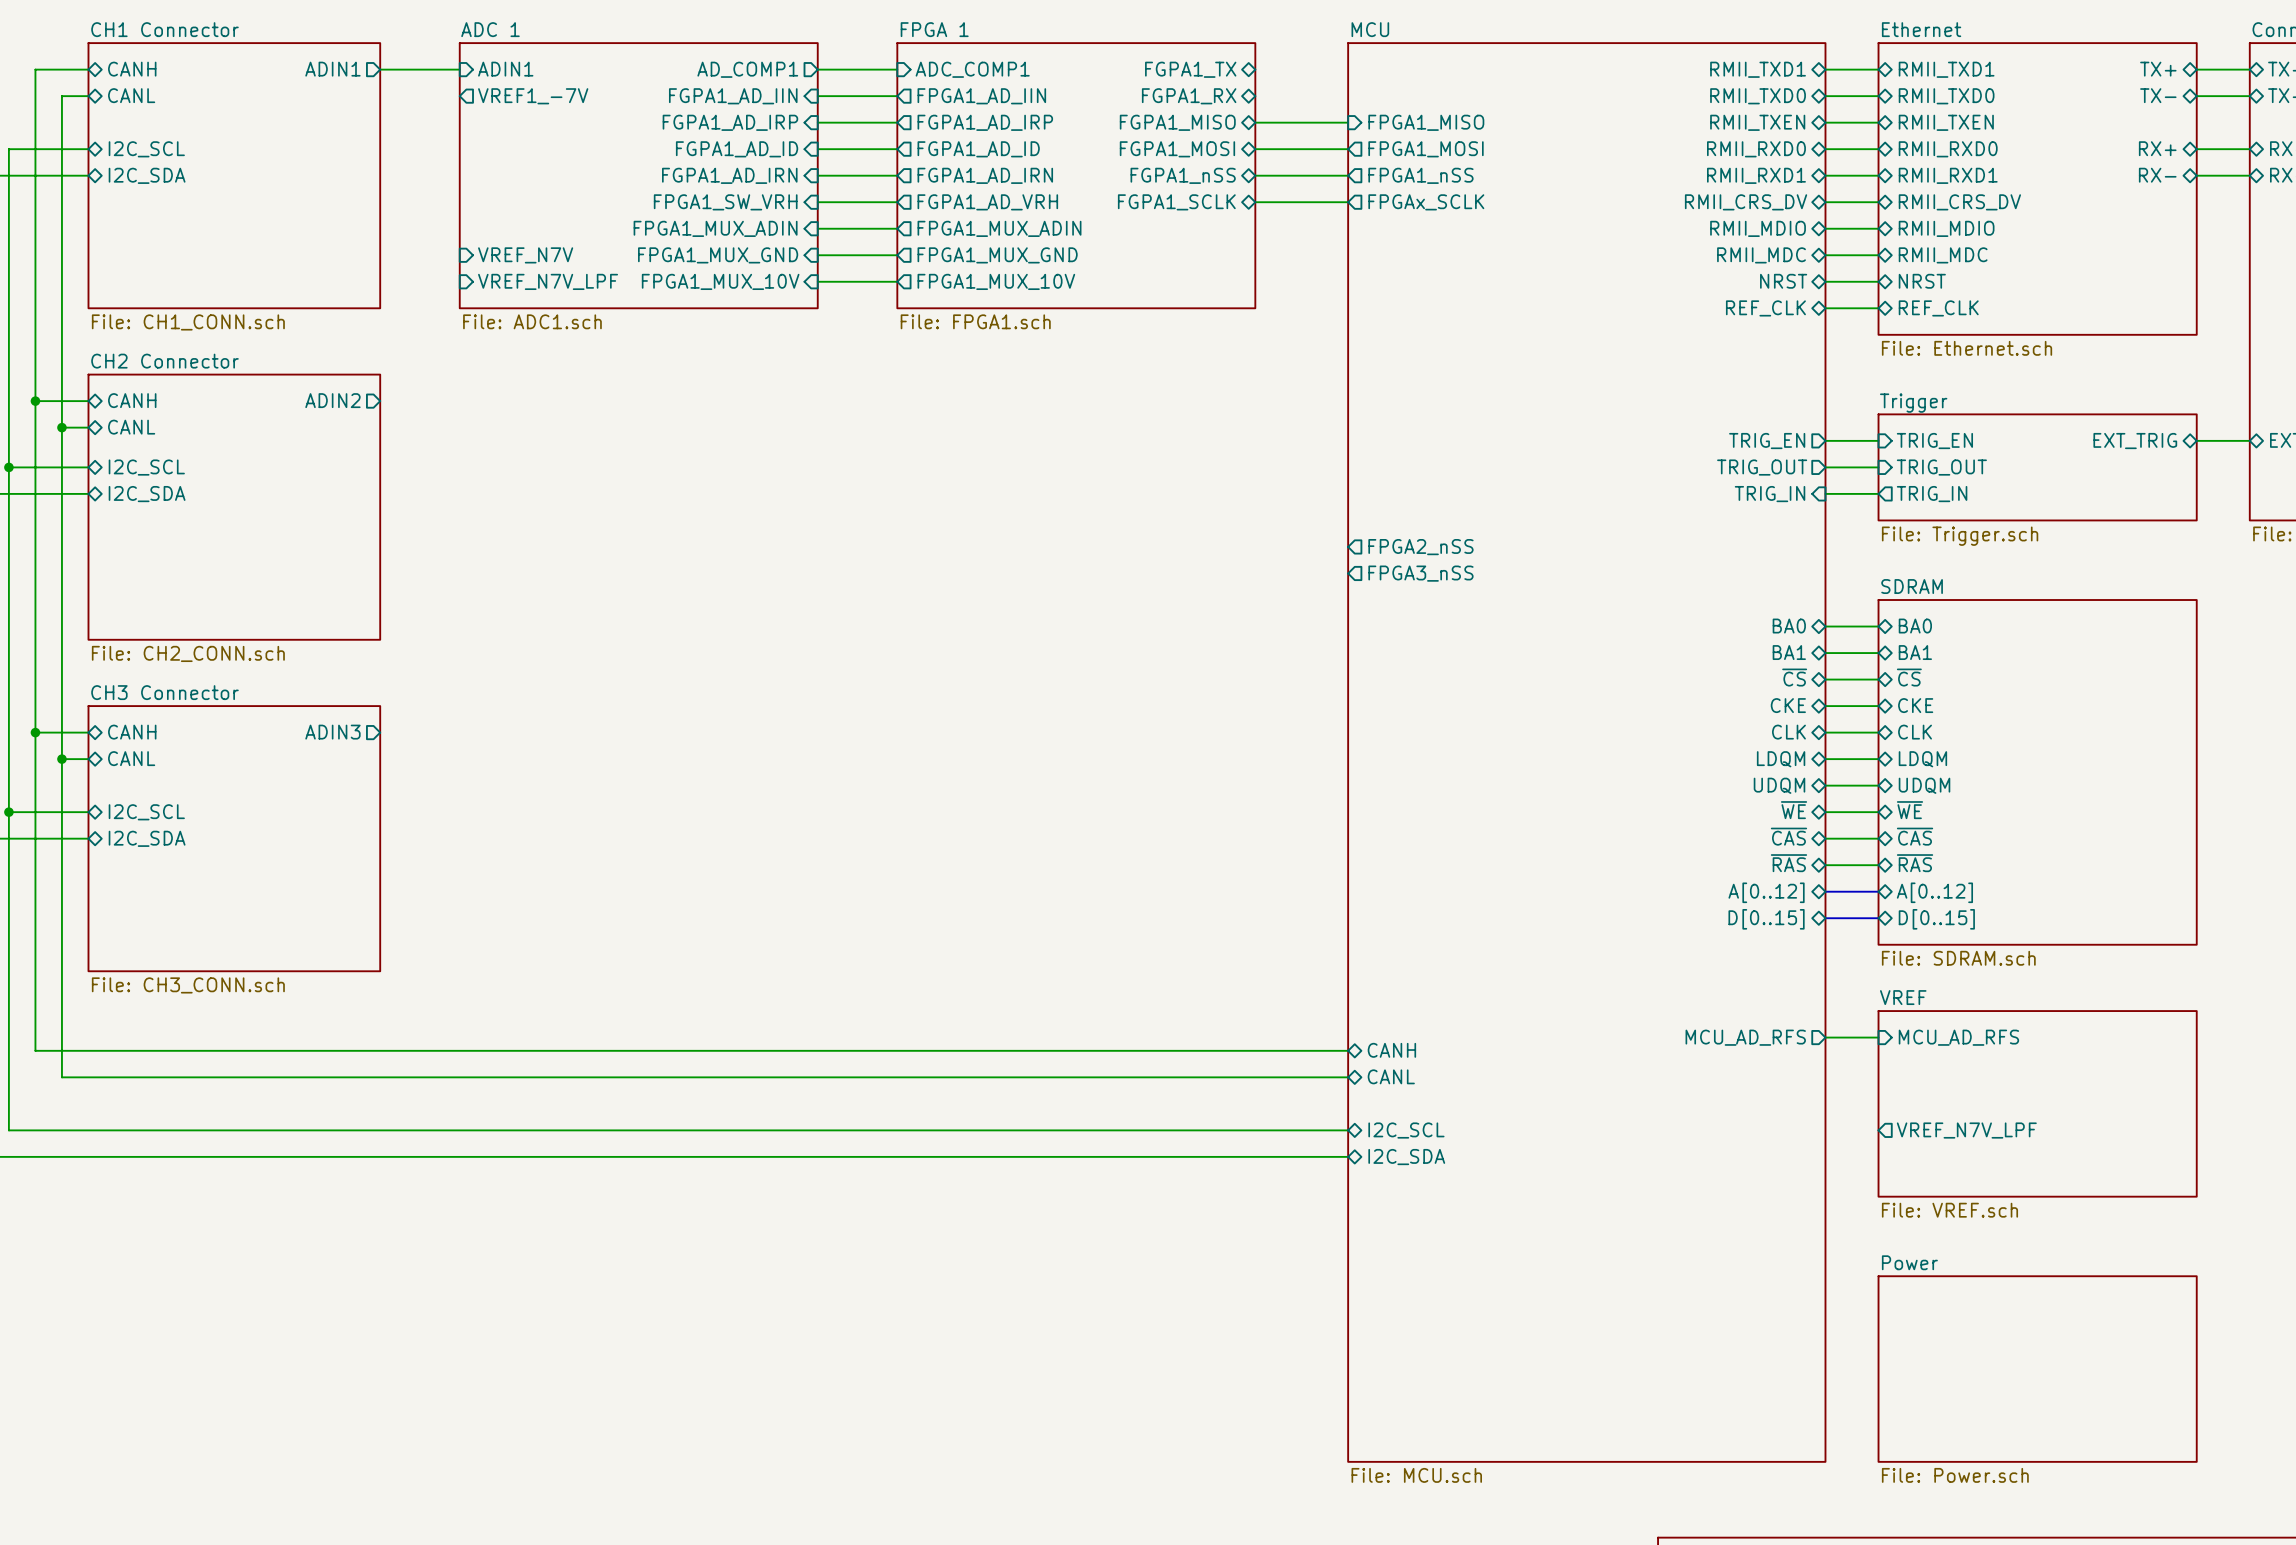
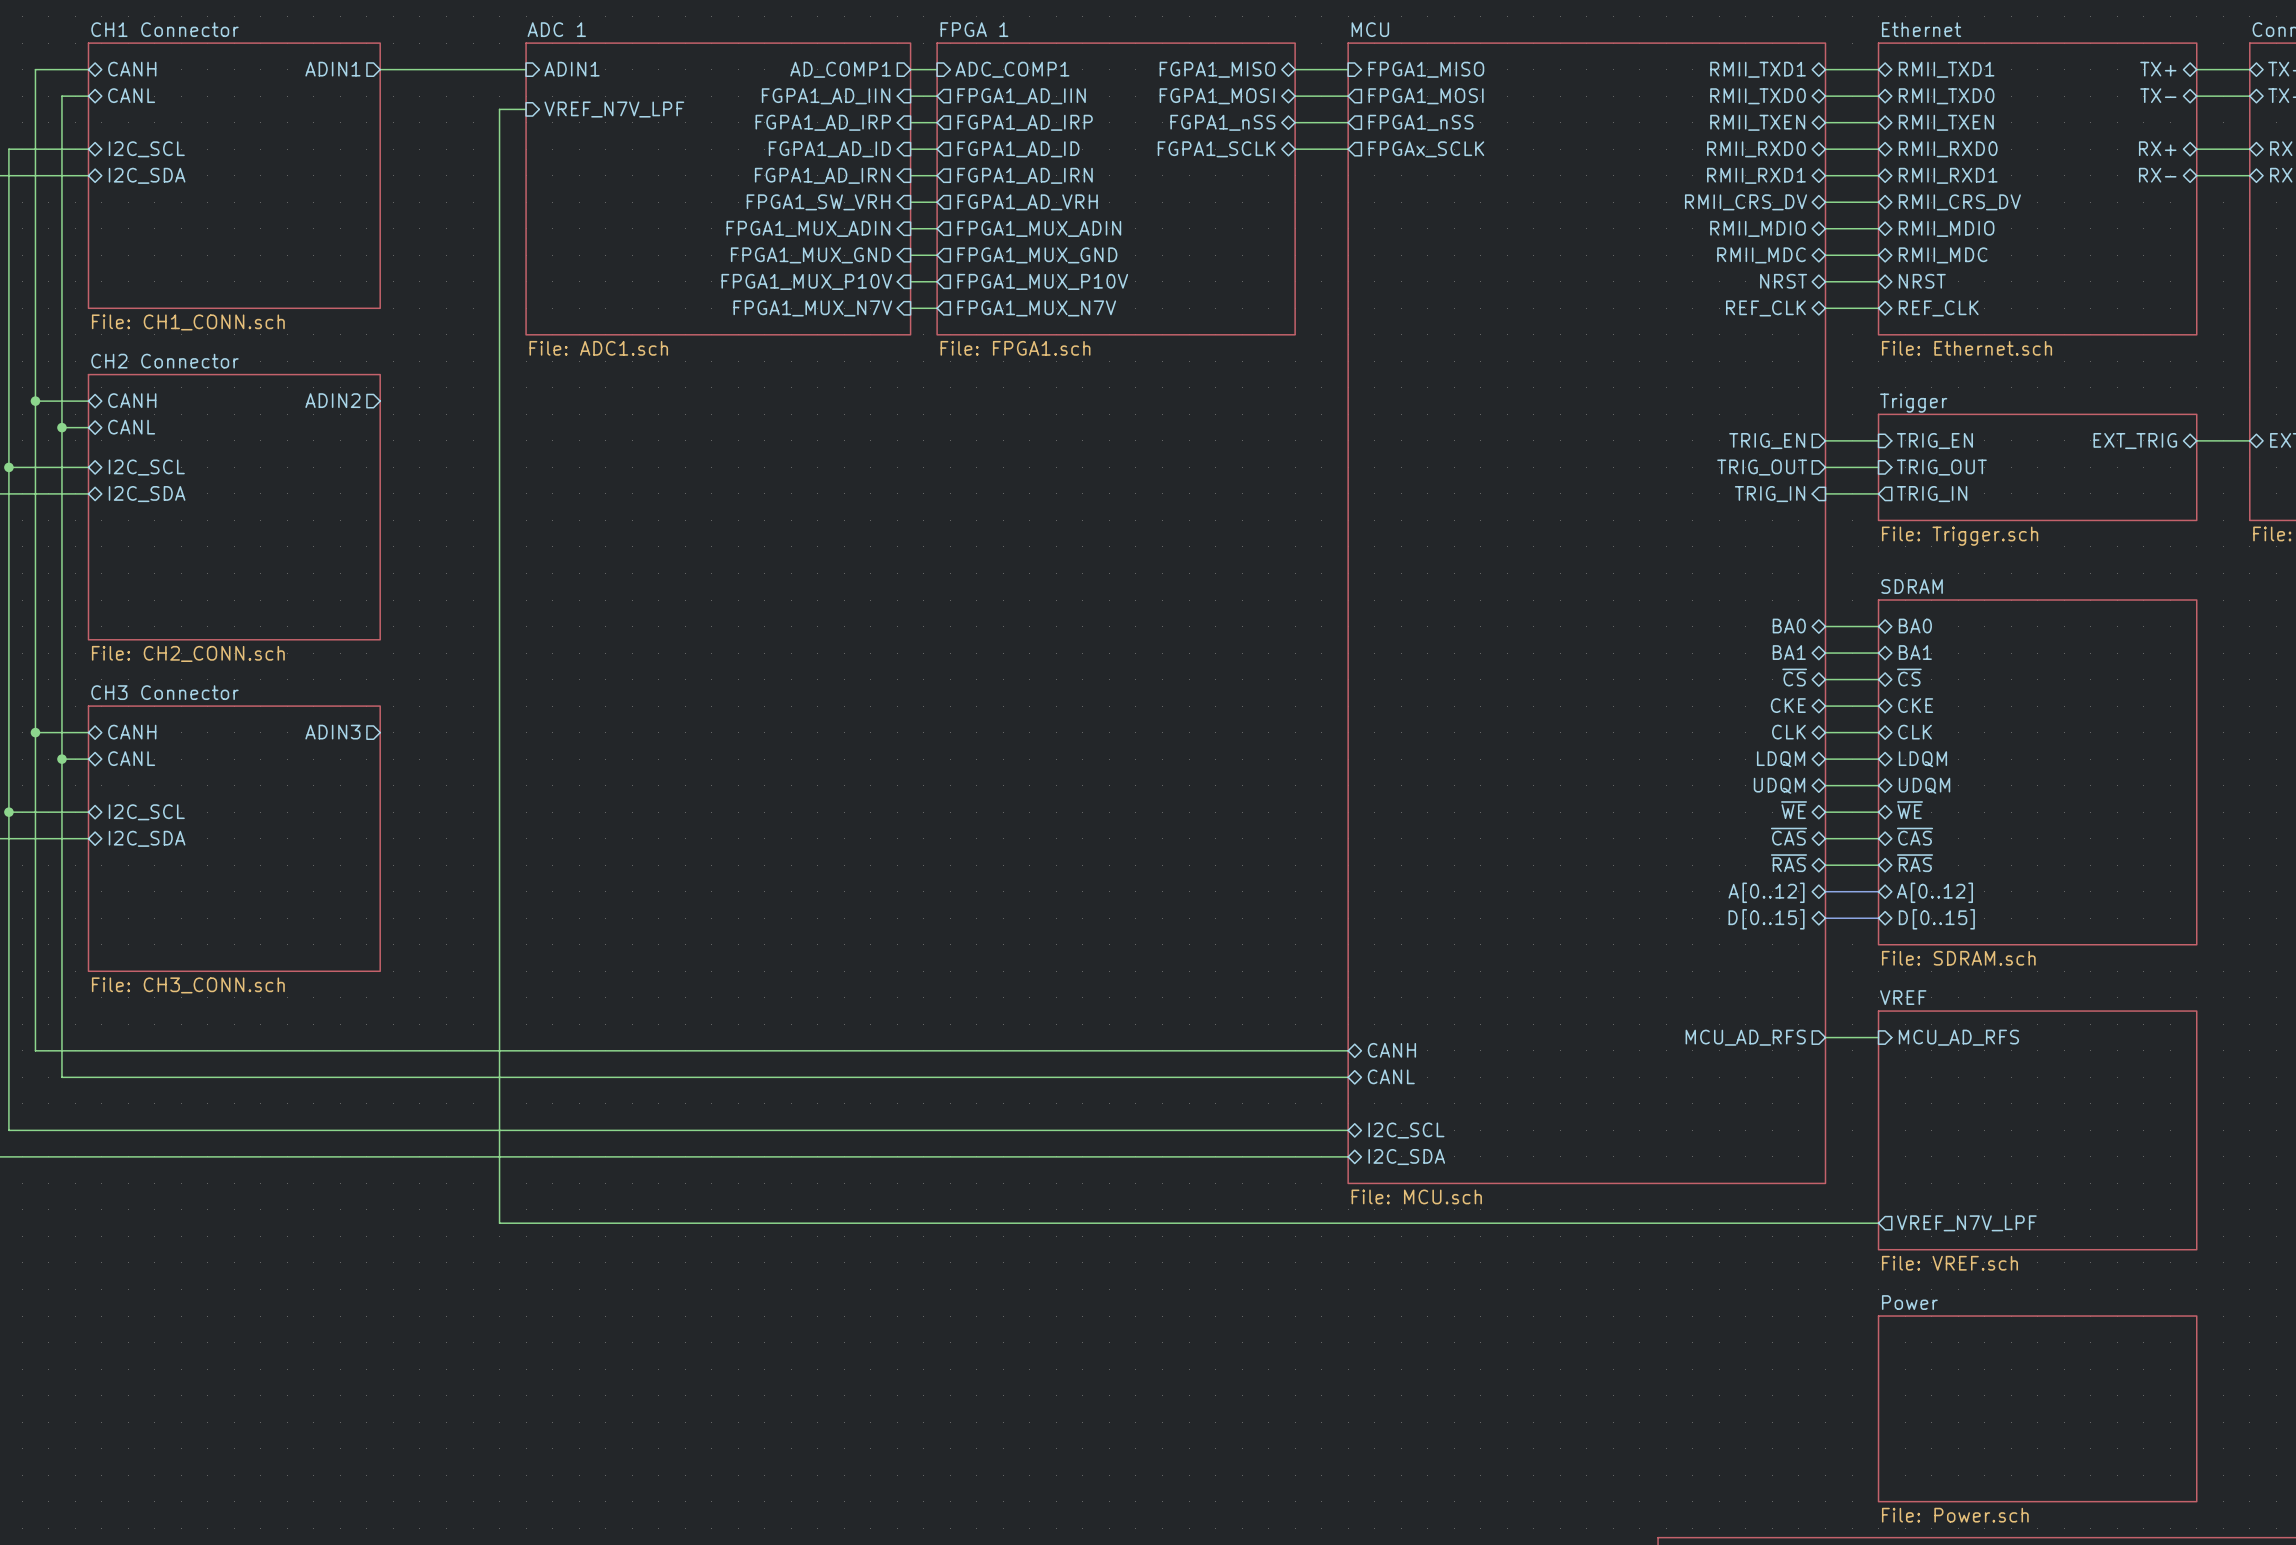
sheet ADC 1 shape: [459, 43, 818, 309] -> [526, 43, 911, 335]
sheet FPGA 1 shape: [897, 43, 1256, 309] -> [937, 43, 1296, 335]
wire: none -> (459, 69) (526, 69)
sheet pin position: ADIN1 (505, 69) -> ADIN1 (572, 69)
sheet pin position: AD_COMP1 (747, 69) -> AD_COMP1 (840, 69)
wire: (817, 69) (897, 69) -> none
wire: none -> (910, 69) (937, 69)
sheet pin position: ADC_COMP1 (972, 69) -> ADC_COMP1 (1012, 69)
sheet pin: FGPA1_TX (1190, 69) -> none
wire: none -> (1295, 69) (1348, 69)
sheet pin: none -> FPGA1_MISO (1426, 69)
sheet pin: VREF1_-7V (533, 96) -> none
sheet pin position: FGPA1_AD_IIN (733, 96) -> FGPA1_AD_IIN (826, 96)
wire: (817, 96) (897, 96) -> none
wire: none -> (910, 96) (937, 96)
sheet pin position: FPGA1_AD_IIN (981, 96) -> FPGA1_AD_IIN (1021, 96)
sheet pin: FGPA1_RX (1189, 96) -> none
wire: none -> (1295, 96) (1348, 96)
sheet pin: none -> FPGA1_MOSI (1426, 96)
wire: none -> (526, 109) (499, 109) (499, 1223) (1878, 1223)
sheet pin: FGPA1_AD_IRP (730, 122) -> none
wire: (817, 122) (897, 122) -> none
sheet pin: none -> FGPA1_AD_IRP (823, 122)
wire: none -> (910, 122) (937, 122)
sheet pin: FGPA1_AD_IRP (985, 122) -> none
sheet pin: none -> FGPA1_AD_IRP (1025, 122)
sheet pin position: FGPA1_MISO (1177, 122) -> FGPA1_MISO (1217, 69)
wire: (1255, 122) (1295, 122) -> none
sheet pin shape: input (1426, 122) -> output (1420, 122)
sheet pin: FPGA1_MISO (1426, 122) -> FPGA1_nSS (1420, 122)
sheet pin: FGPA1_AD_ID (737, 149) -> none
wire: (817, 149) (897, 149) -> none
sheet pin: none -> FGPA1_AD_ID (829, 149)
wire: none -> (910, 149) (937, 149)
sheet pin: FGPA1_AD_ID (978, 149) -> none
sheet pin: none -> FGPA1_AD_ID (1018, 149)
sheet pin position: FGPA1_MOSI (1177, 149) -> FGPA1_MOSI (1217, 96)
wire: (1255, 149) (1295, 149) -> none
sheet pin: FPGA1_MOSI (1426, 149) -> FPGAx_SCLK (1426, 149)
sheet pin: FGPA1_AD_IRN (729, 175) -> none
wire: (817, 175) (897, 175) -> none
sheet pin: none -> FGPA1_AD_IRN (822, 175)
wire: none -> (910, 175) (937, 175)
sheet pin: FGPA1_AD_IRN (985, 175) -> none
sheet pin: none -> FGPA1_AD_IRN (1025, 175)
sheet pin position: FGPA1_nSS (1183, 175) -> FGPA1_nSS (1222, 122)
wire: (1255, 175) (1348, 175) -> none
sheet pin: FPGA1_nSS (1420, 175) -> none
sheet pin position: FPGA1_SW_VRH (725, 202) -> FPGA1_SW_VRH (818, 202)
wire: (817, 202) (897, 202) -> none
wire: none -> (910, 202) (937, 202)
sheet pin position: FGPA1_AD_VRH (987, 202) -> FGPA1_AD_VRH (1027, 202)
sheet pin position: FGPA1_SCLK (1176, 202) -> FGPA1_SCLK (1216, 149)
wire: (1255, 202) (1348, 202) -> none
sheet pin: FPGAx_SCLK (1426, 202) -> none
sheet pin: FPGA1_MUX_ADIN (715, 228) -> none
sheet pin: none -> FPGA1_MUX_ADIN (808, 228)
wire: (817, 228) (897, 228) -> none
wire: none -> (910, 228) (937, 228)
sheet pin: FPGA1_MUX_ADIN (999, 228) -> none
sheet pin: none -> FPGA1_MUX_ADIN (1039, 228)
sheet pin: VREF_N7V (525, 255) -> none
sheet pin: FPGA1_MUX_GND (718, 255) -> none
sheet pin: none -> FPGA1_MUX_GND (810, 255)
wire: (817, 255) (897, 255) -> none
wire: none -> (910, 255) (937, 255)
sheet pin: FPGA1_MUX_GND (997, 255) -> none
sheet pin: none -> FPGA1_MUX_GND (1037, 255)
sheet pin position: VREF_N7V_LPF (548, 281) -> VREF_N7V_LPF (614, 109)
sheet pin: FPGA1_MUX_10V (720, 281) -> none
sheet pin: none -> FPGA1_MUX_P10V (806, 281)
wire: (817, 281) (897, 281) -> none
wire: none -> (910, 281) (937, 281)
sheet pin: FPGA1_MUX_10V (996, 281) -> none
sheet pin: none -> FPGA1_MUX_P10V (1042, 281)
sheet pin: none -> FPGA1_MUX_N7V (812, 308)
sheet pin: none -> FPGA1_MUX_N7V (1036, 308)
sheet pin: FPGA2_nSS (1420, 547) -> none
sheet pin: FPGA3_nSS (1420, 573) -> none
sheet MCU: none -> File: MCU.sch (1586, 613)
sheet MCU: File: MCU.sch (1586, 752) -> none
sheet VREF: File: VREF.sch (2037, 1103) -> none
sheet pin position: VREF_N7V_LPF (1966, 1130) -> VREF_N7V_LPF (1966, 1223)
sheet VREF: none -> File: VREF.sch (2037, 1130)
sheet Power position: (2037, 1369) -> (2037, 1408)

